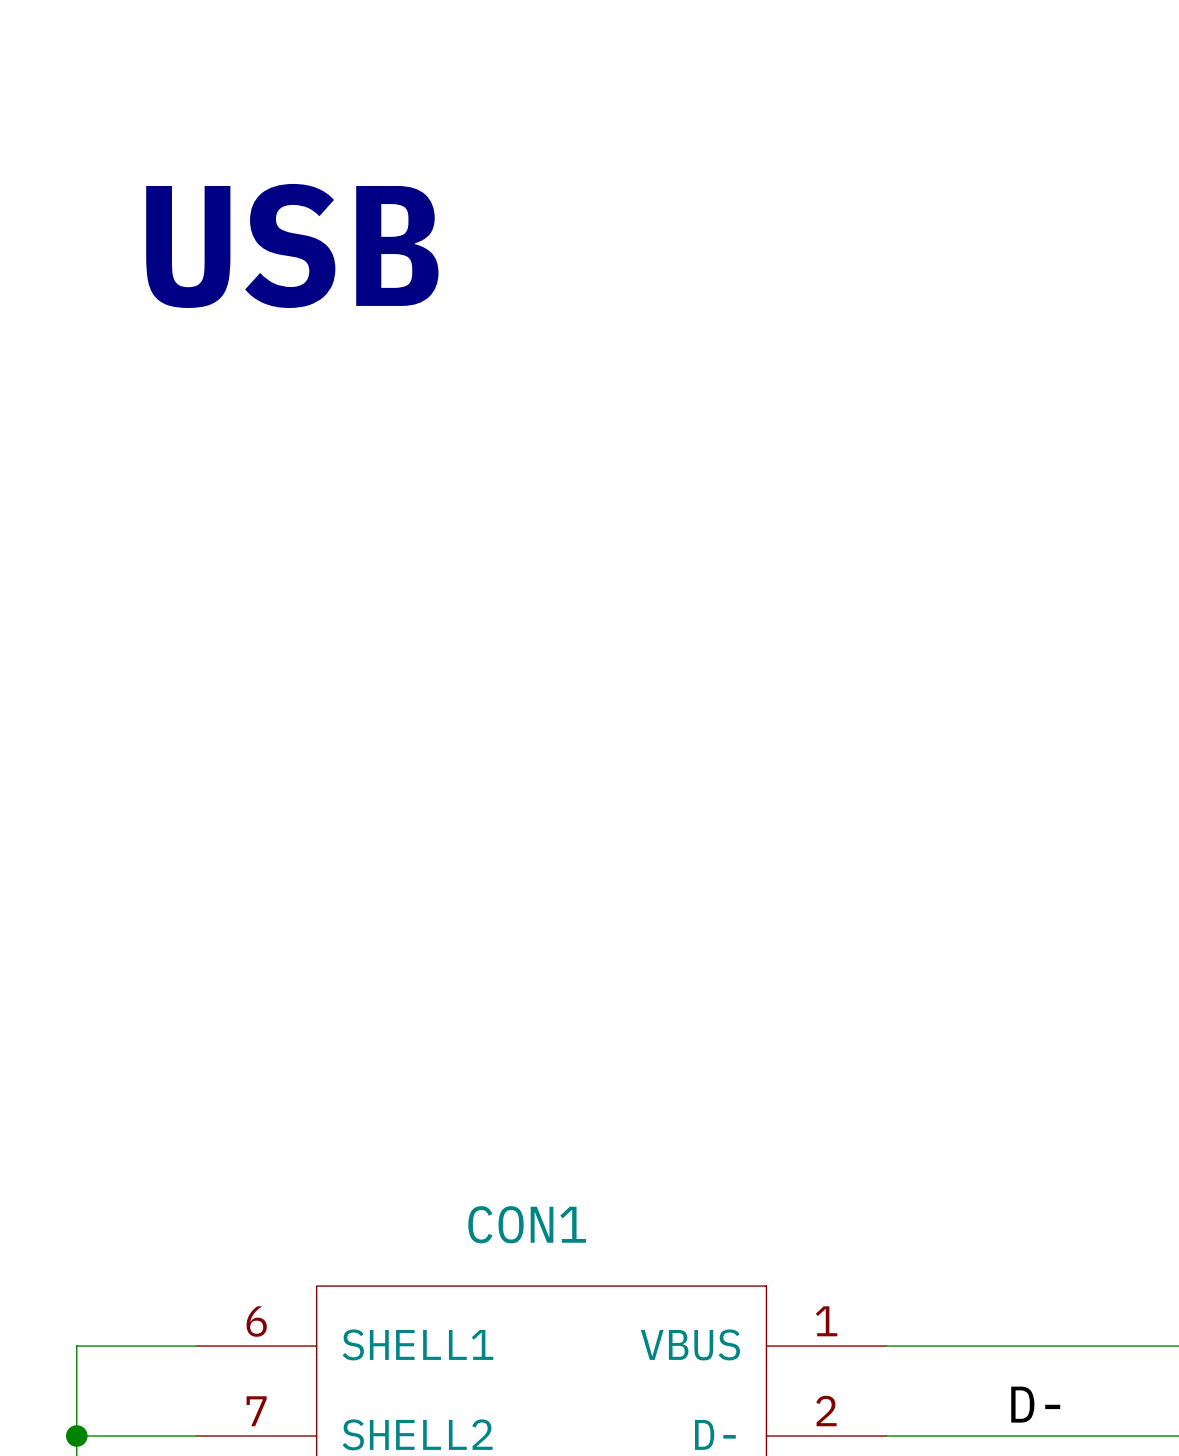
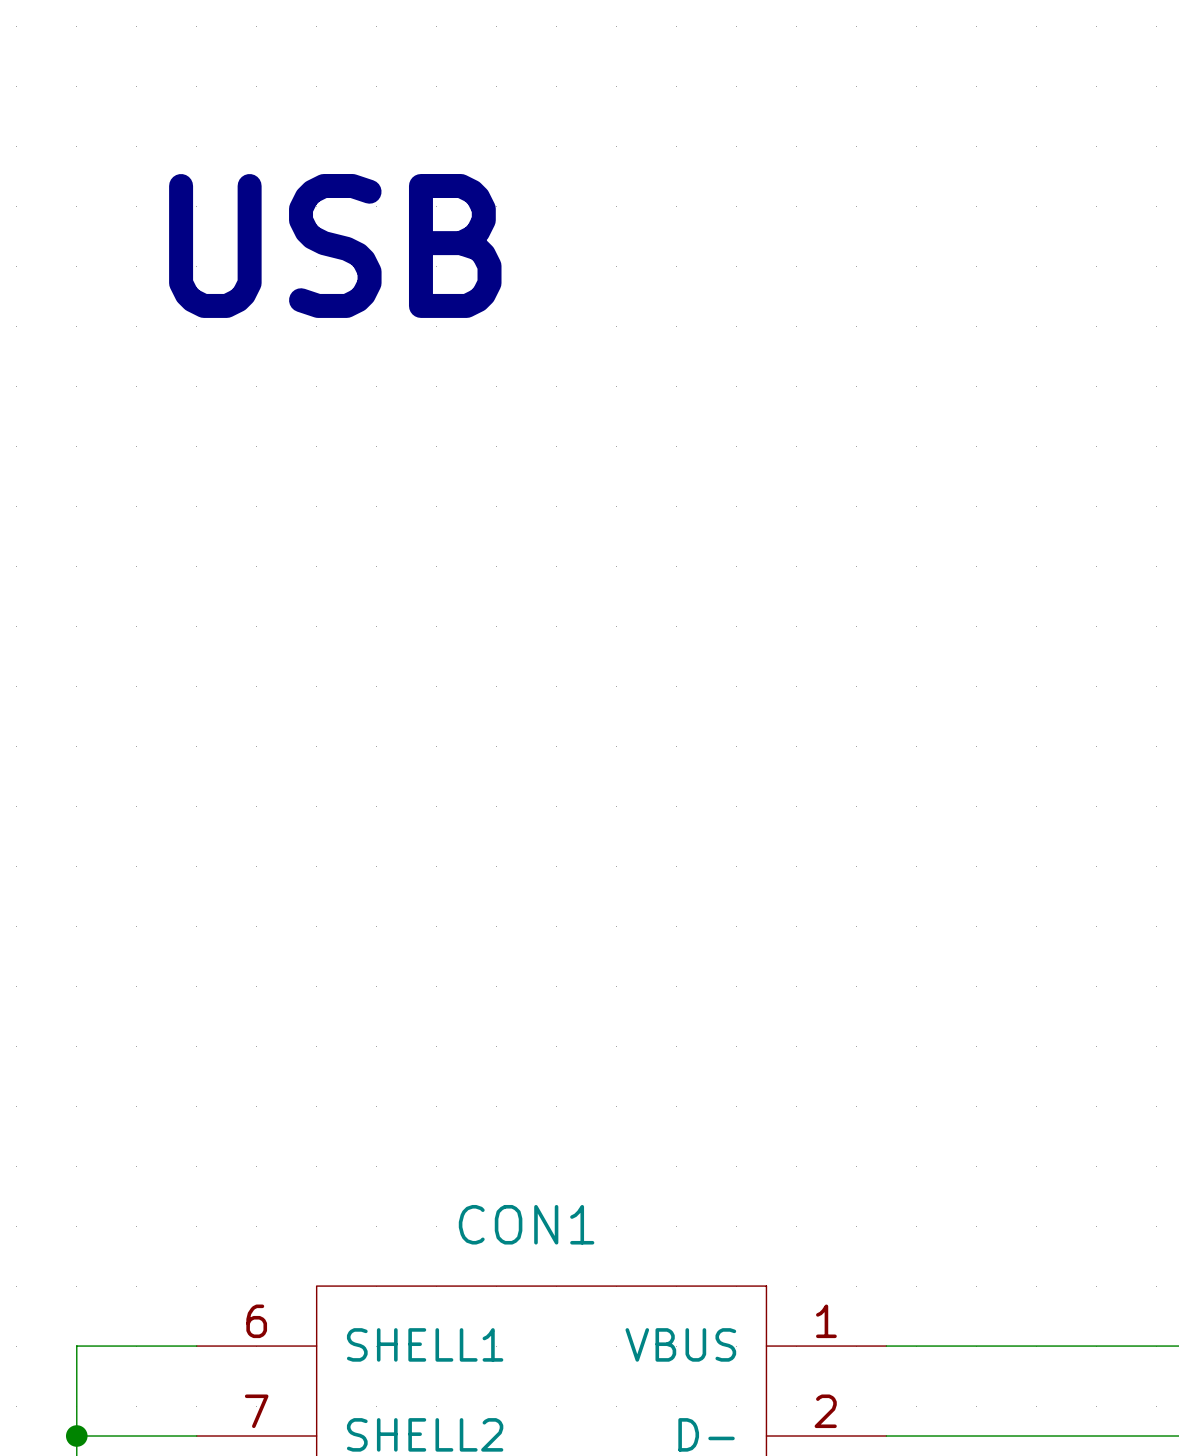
label: D- (1035, 1404) -> none

